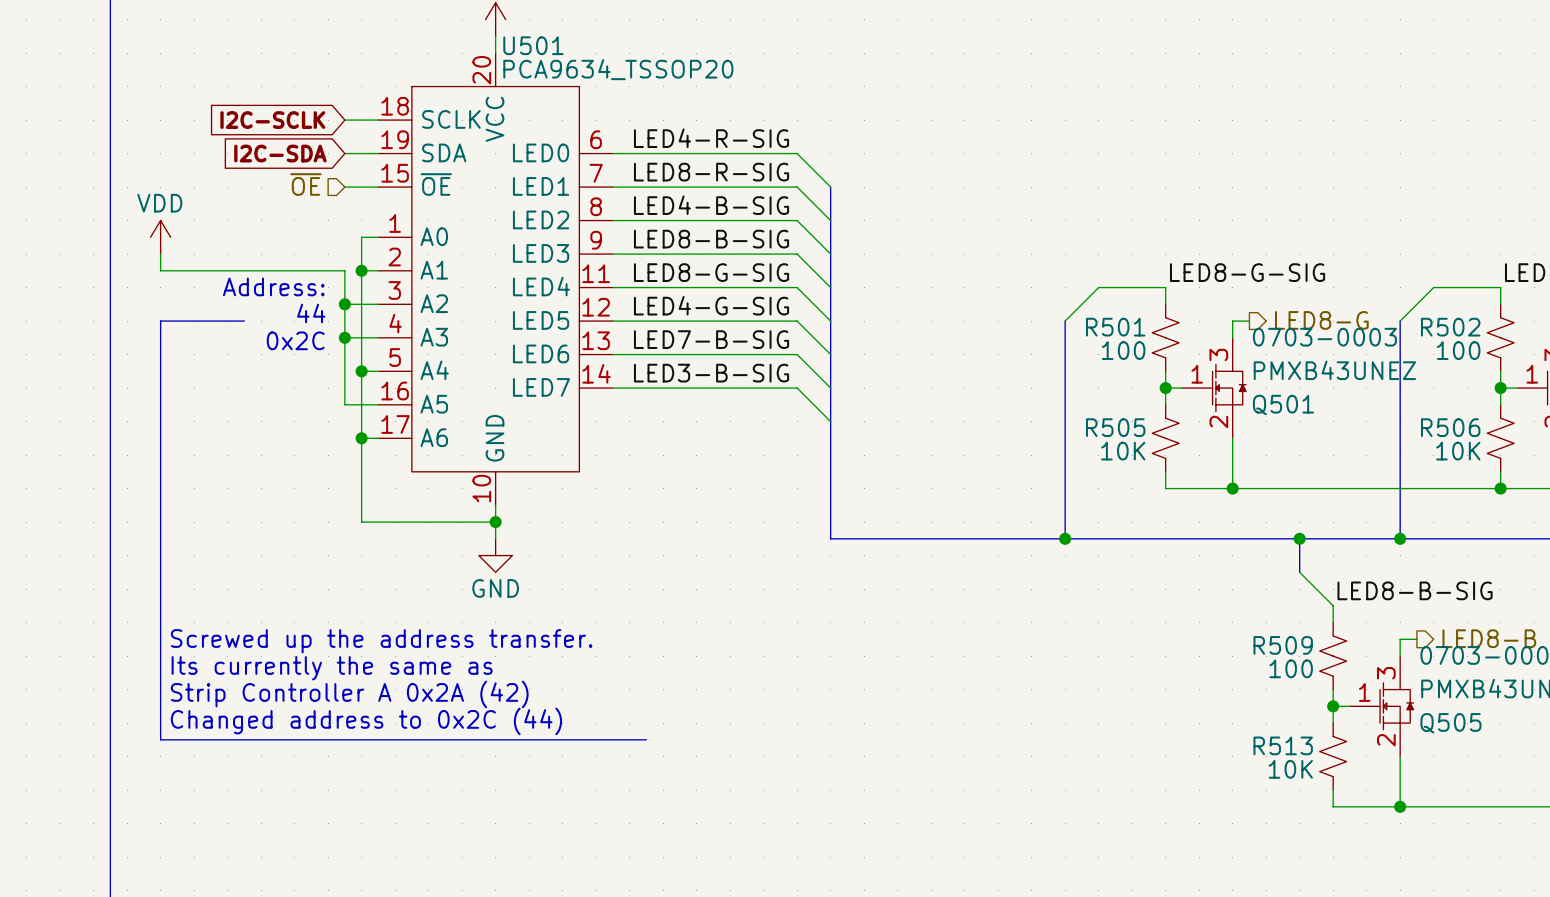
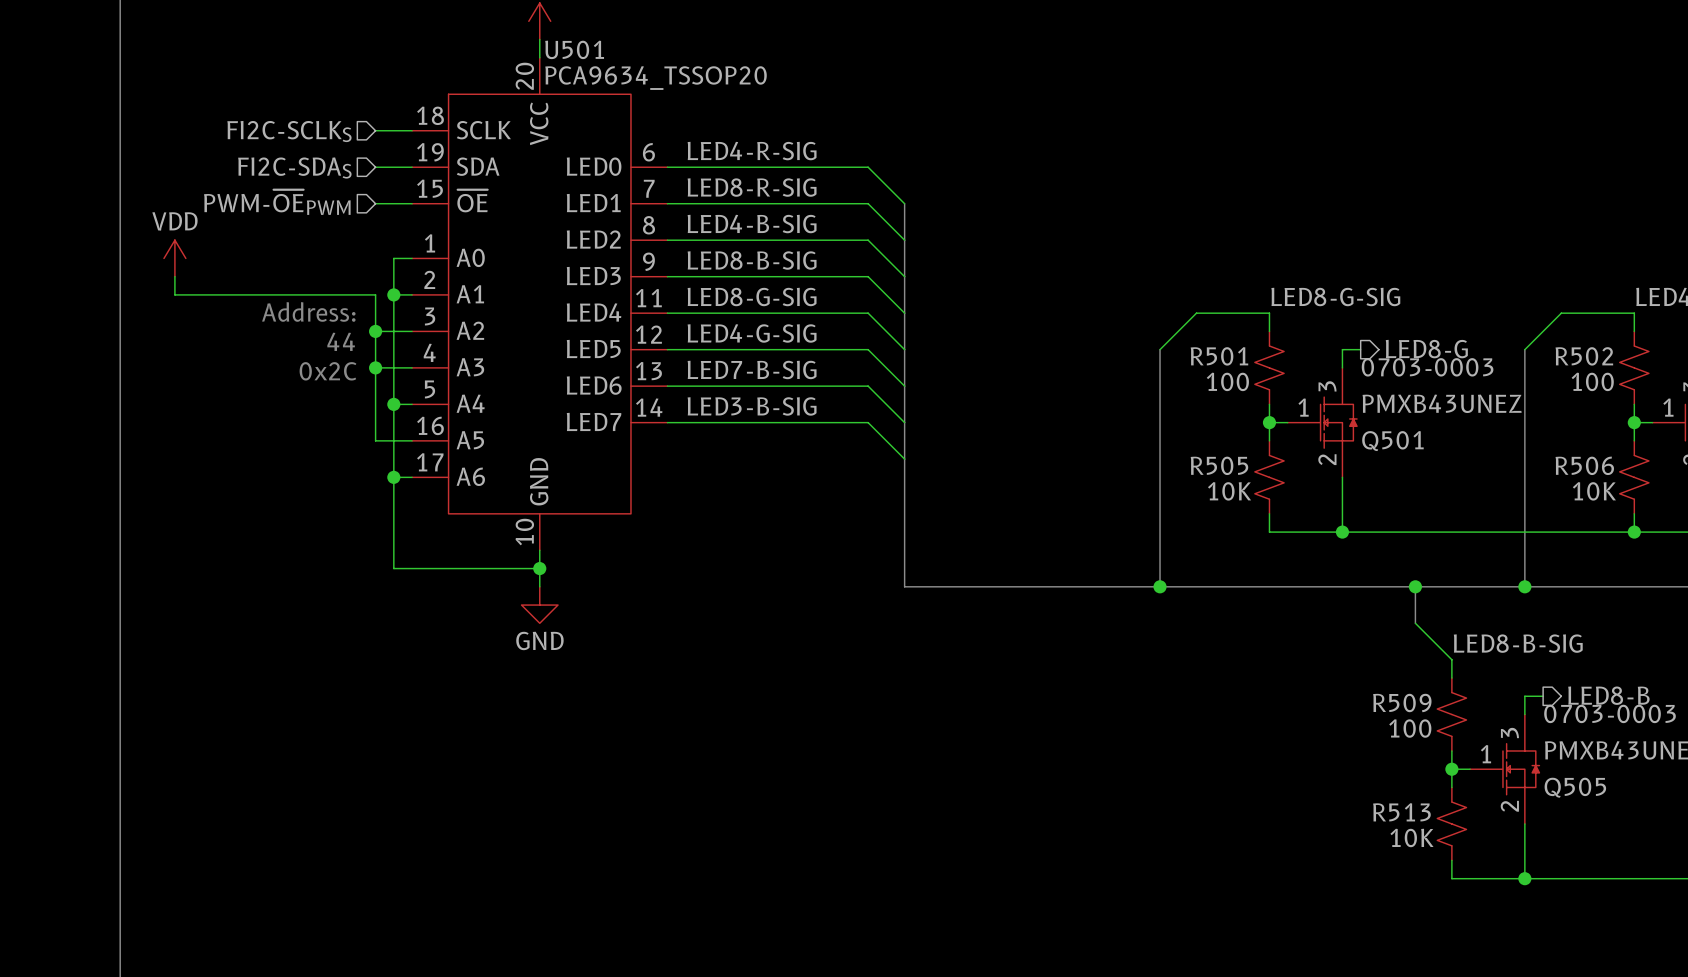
hierarchical label: none -> FI2C-SCLKS (289, 131)
global label: I2C-SCLK (272, 120) -> none
global label: I2C-SDA (280, 153) -> none
hierarchical label: none -> FI2C-SDAS (294, 168)
hierarchical label: ~{OE} (305, 184) -> PWM-~{OE}PWM (277, 202)
line: (244, 321) (160, 321) (160, 739) (646, 739) -> none
text: Screwed up the address transfer. (381, 641) -> none
text: Its currently the same as (332, 668) -> none
text: Strip Controller A 0x2A (42) (349, 694) -> none
text: Changed address to 0x2C (44) (366, 721) -> none

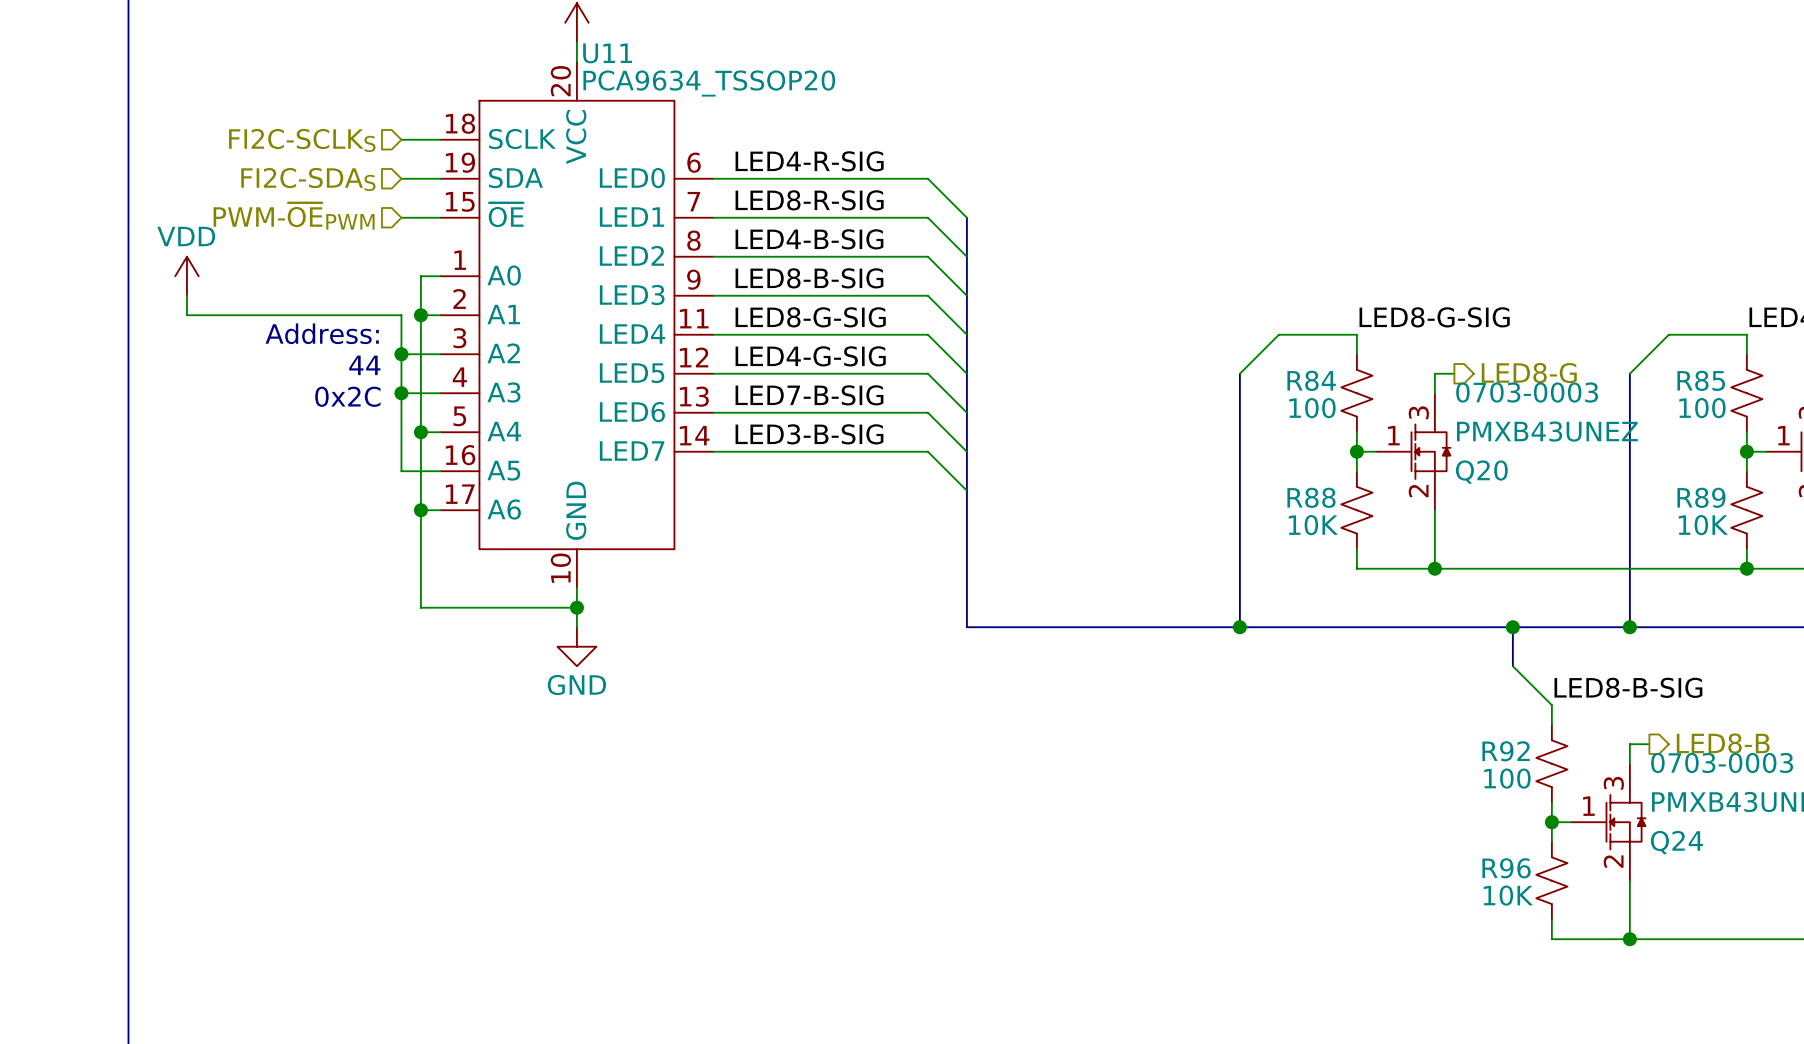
U501 name: U501 (574, 49) -> U11 (607, 53)
R501 name: R501 (1219, 356) -> R84 (1311, 380)
R502 name: R502 (1584, 356) -> R85 (1701, 380)
Q501 name: Q501 (1392, 441) -> Q20 (1481, 472)
R505 name: R505 (1219, 465) -> R88 (1311, 497)
R506 name: R506 (1584, 465) -> R89 (1701, 497)
R509 name: R509 (1402, 703) -> R92 (1506, 751)
Q505 name: Q505 (1575, 787) -> Q24 (1676, 842)
R513 name: R513 (1401, 812) -> R96 (1506, 868)

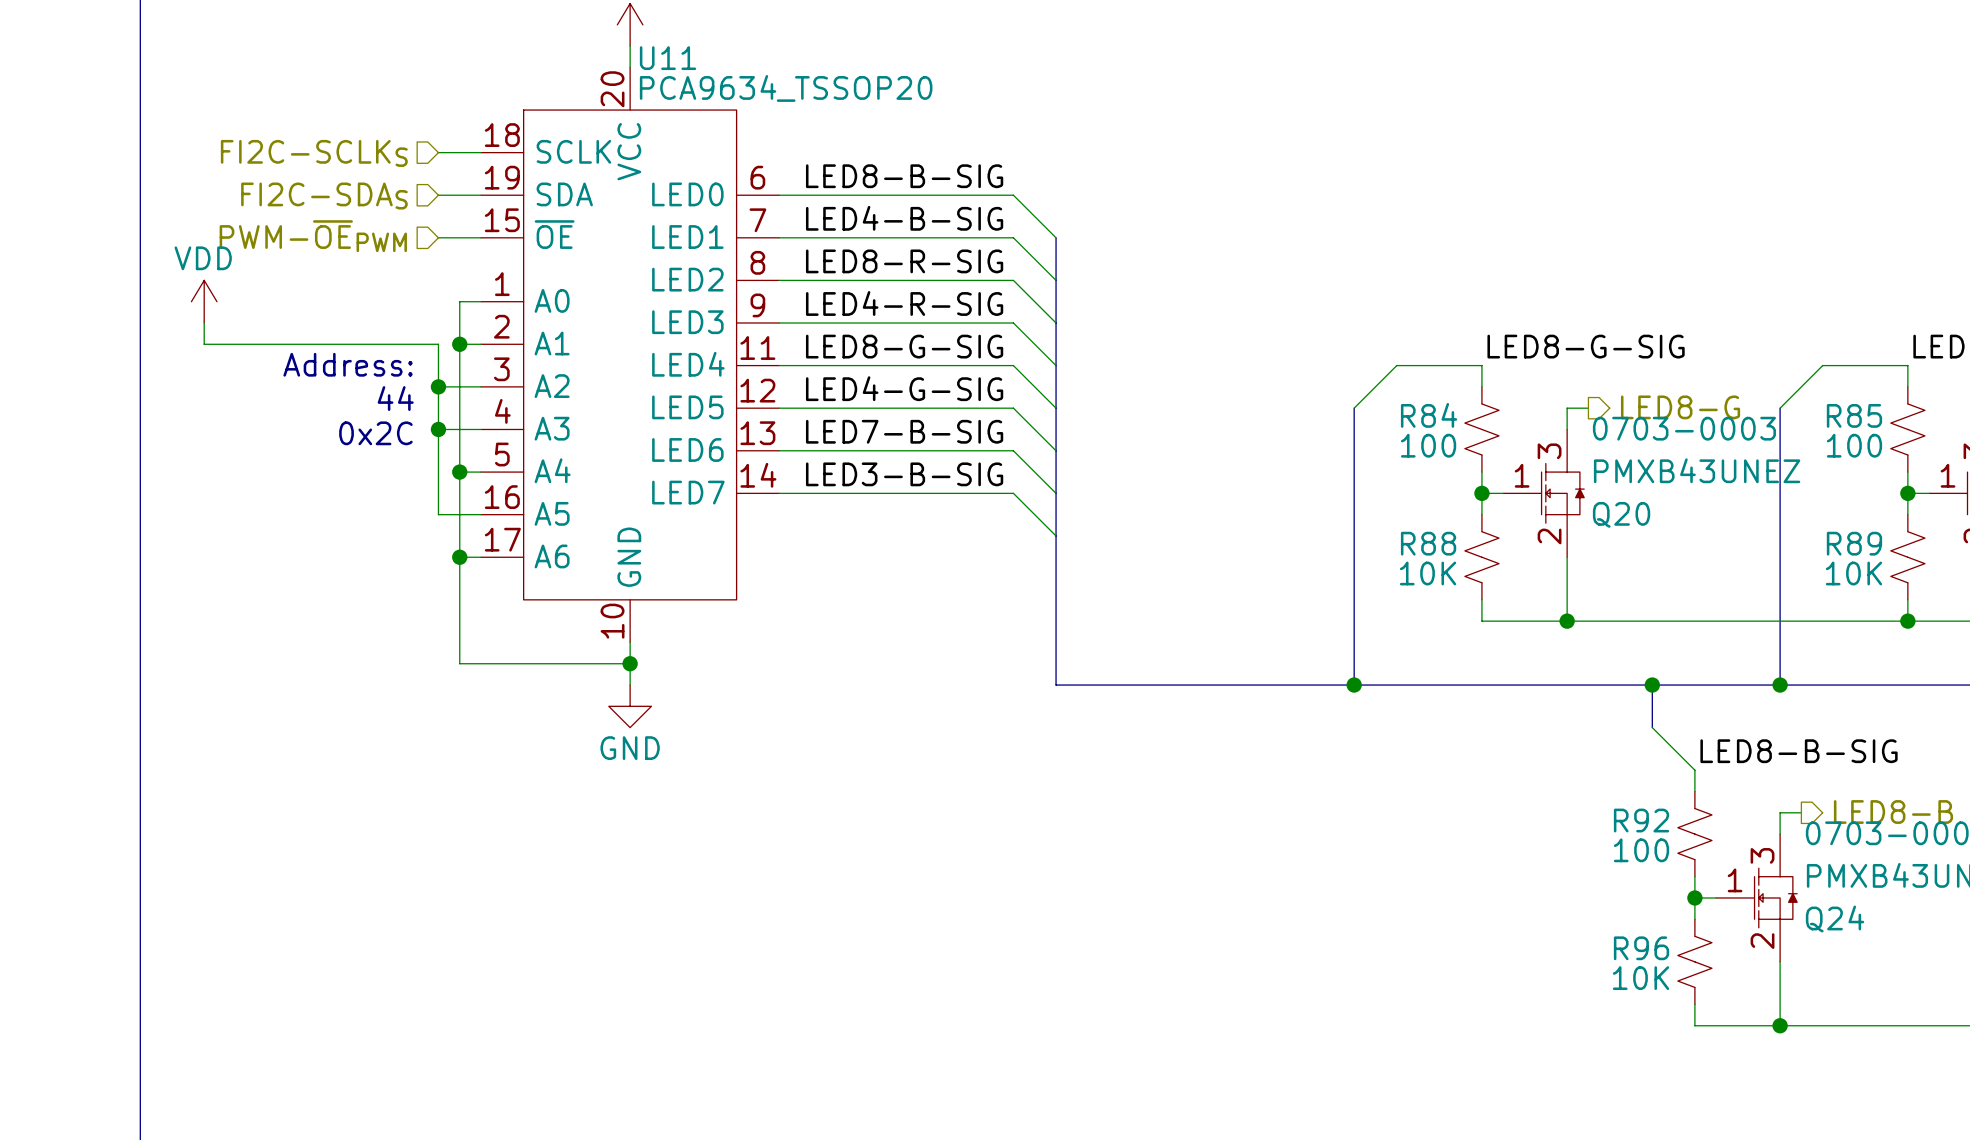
label: LED4-R-SIG (809, 161) -> LED8-B-SIG (904, 176)
label: LED8-R-SIG (809, 200) -> LED4-B-SIG (904, 218)
label: LED4-B-SIG (809, 239) -> LED8-R-SIG (904, 261)
label: LED8-B-SIG (809, 278) -> LED4-R-SIG (904, 303)

